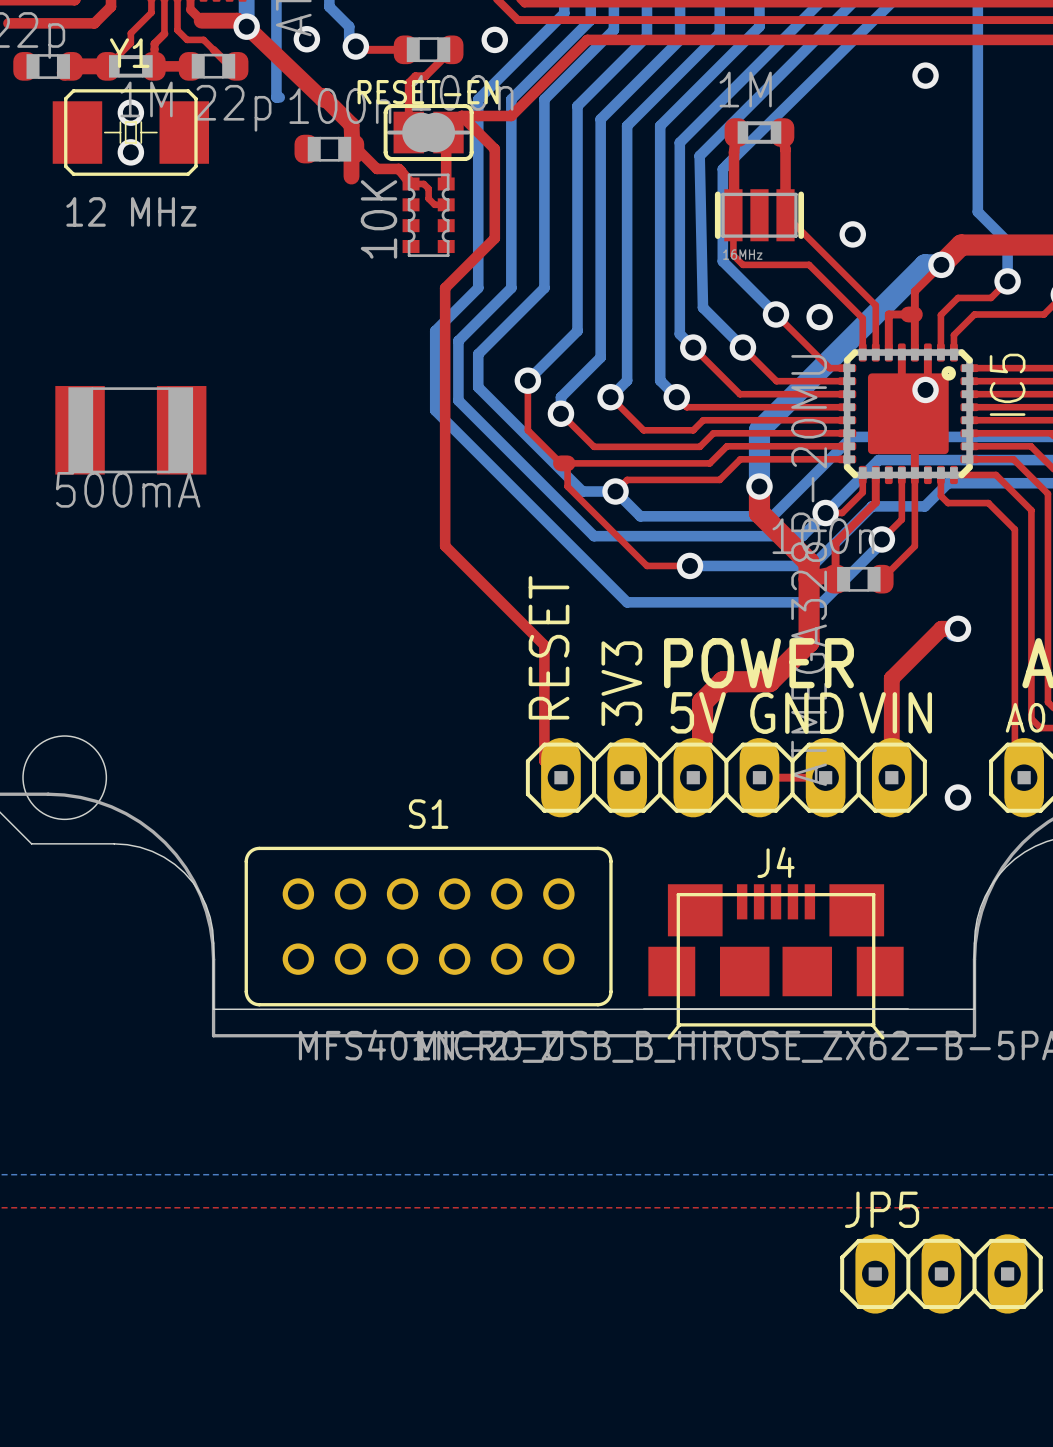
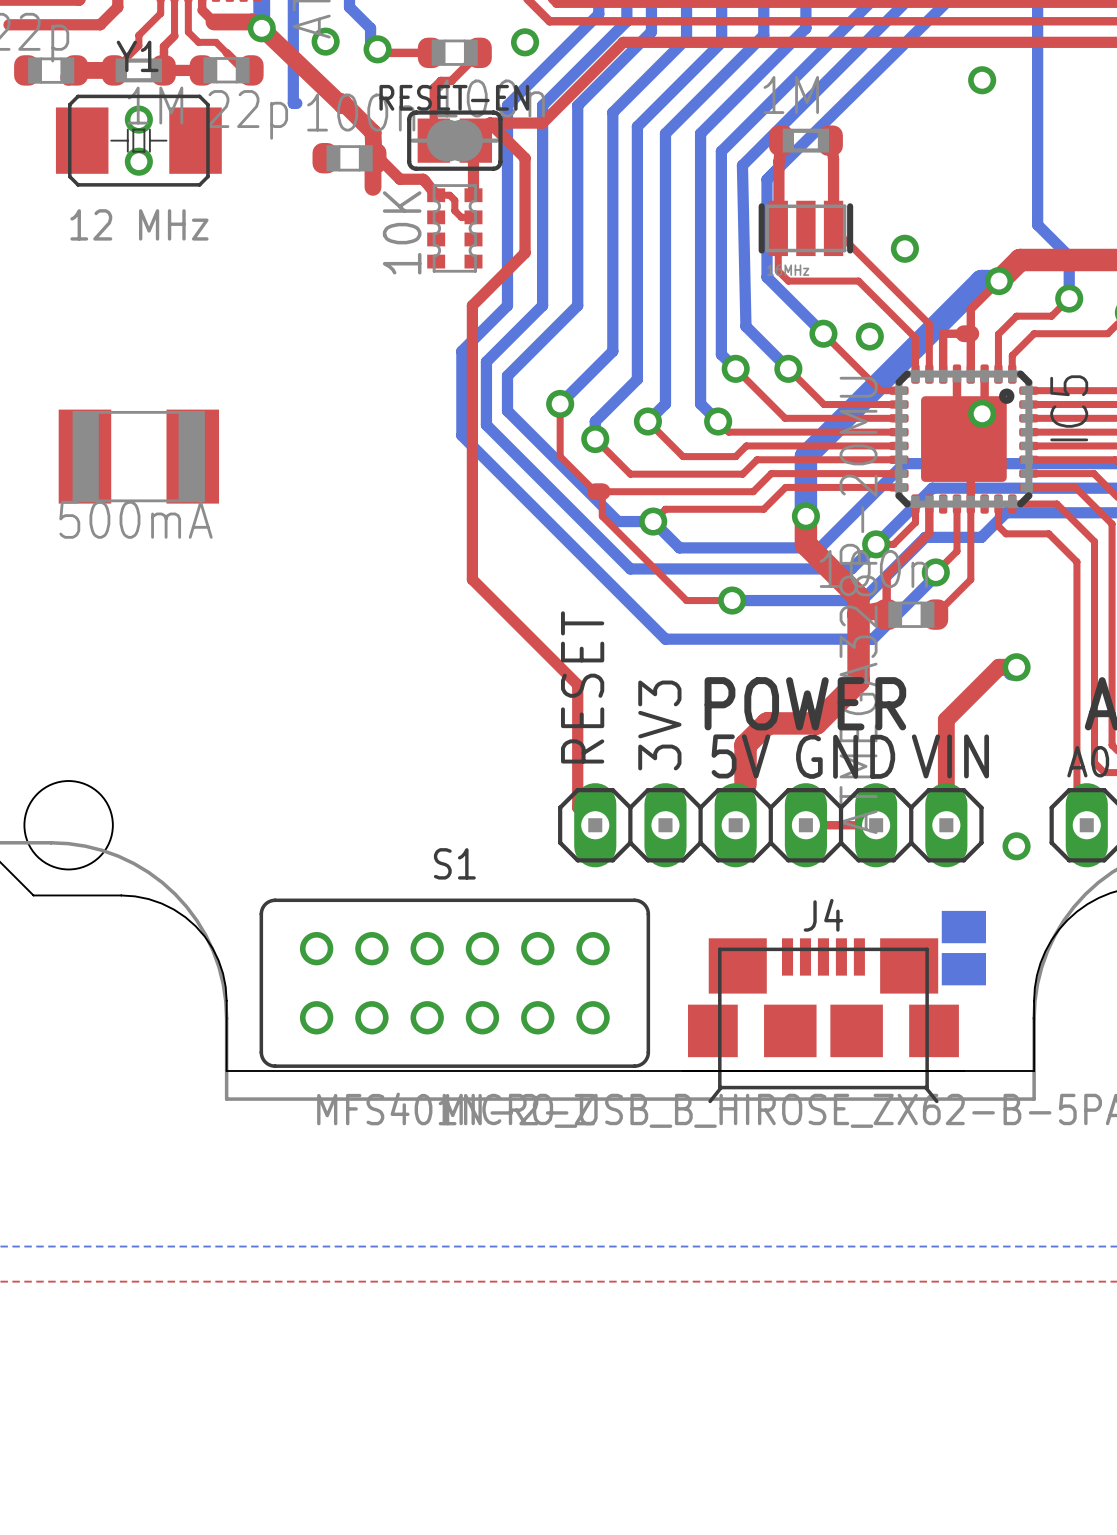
part: none -> (963, 948)
JP5: (941, 1273) -> none

